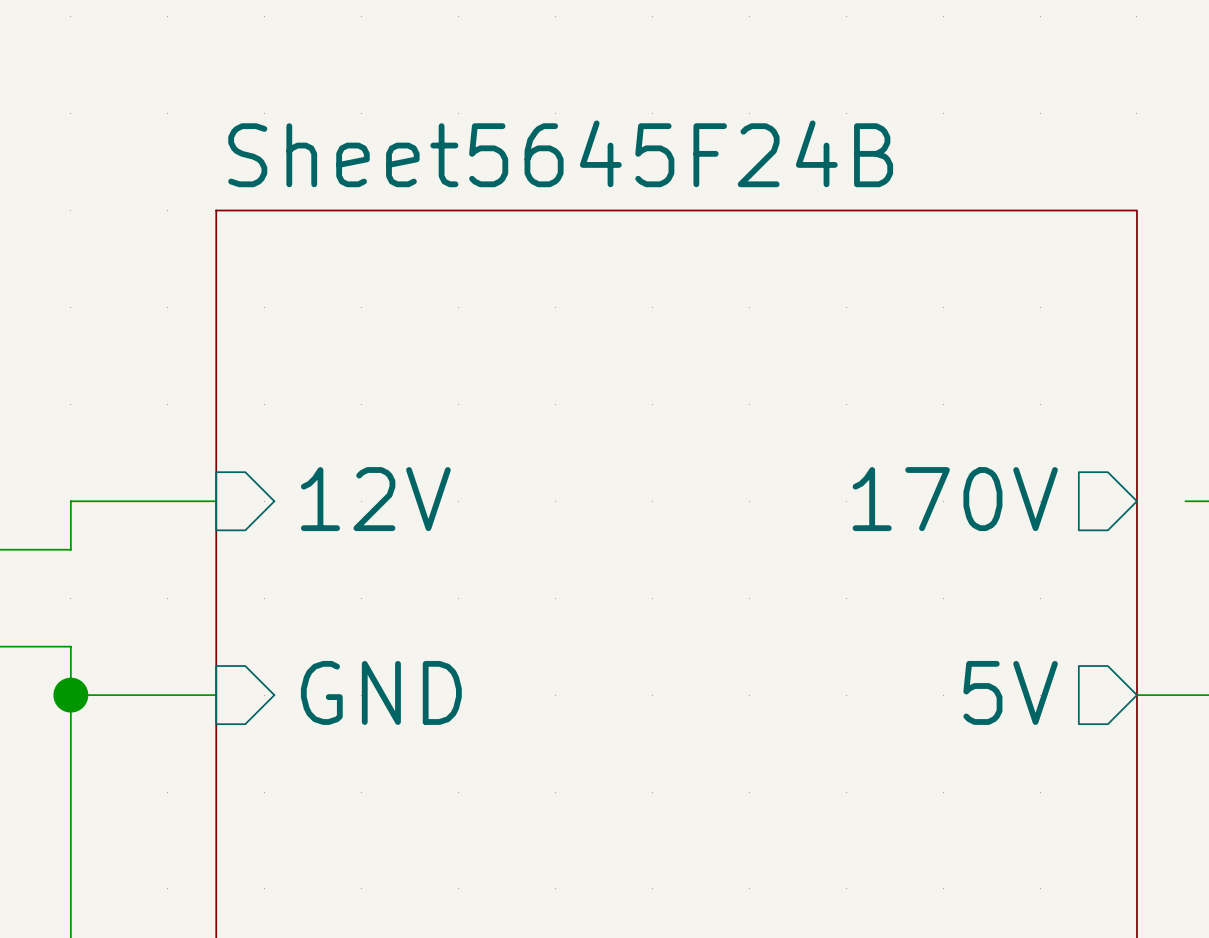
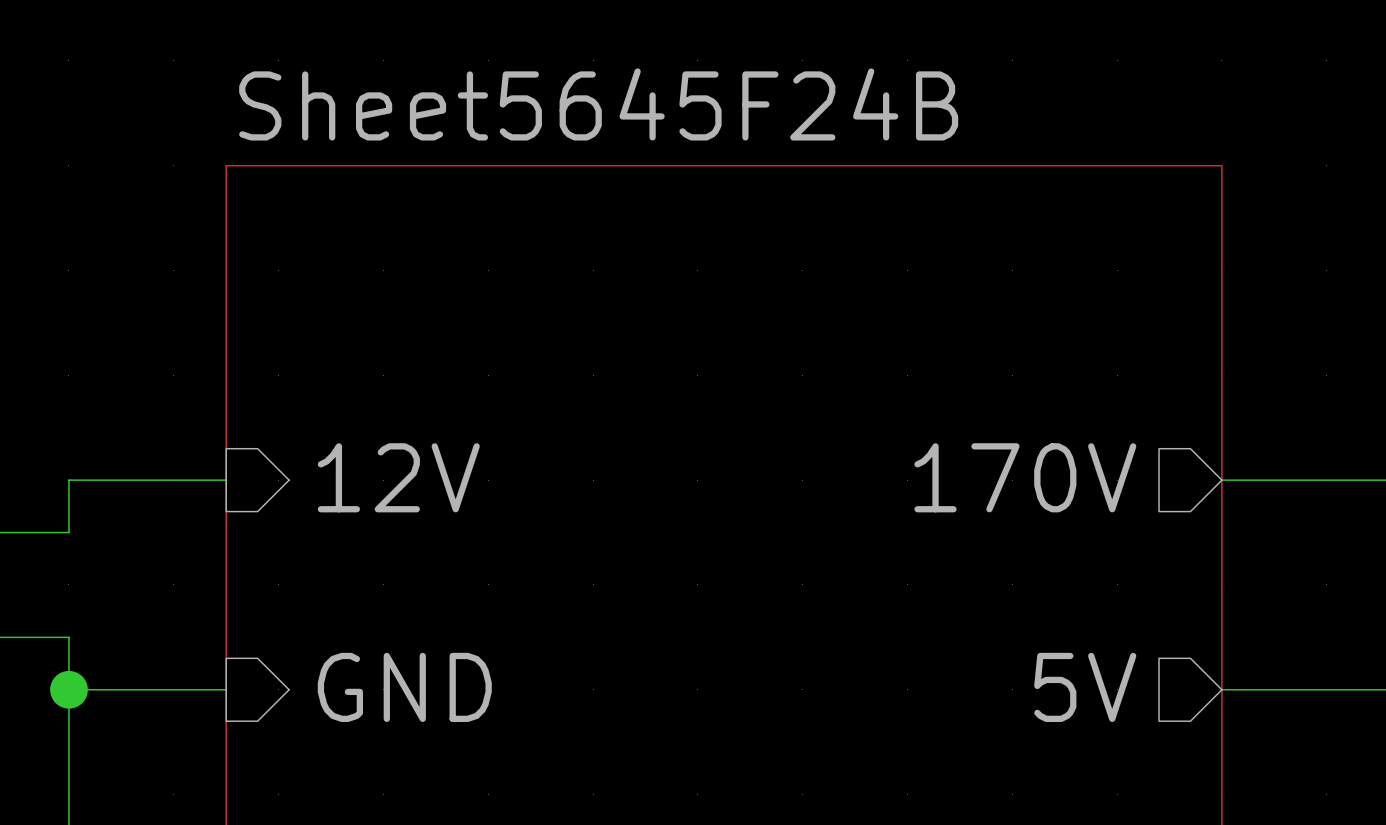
wire: none -> (1221, 480) (1274, 480)

